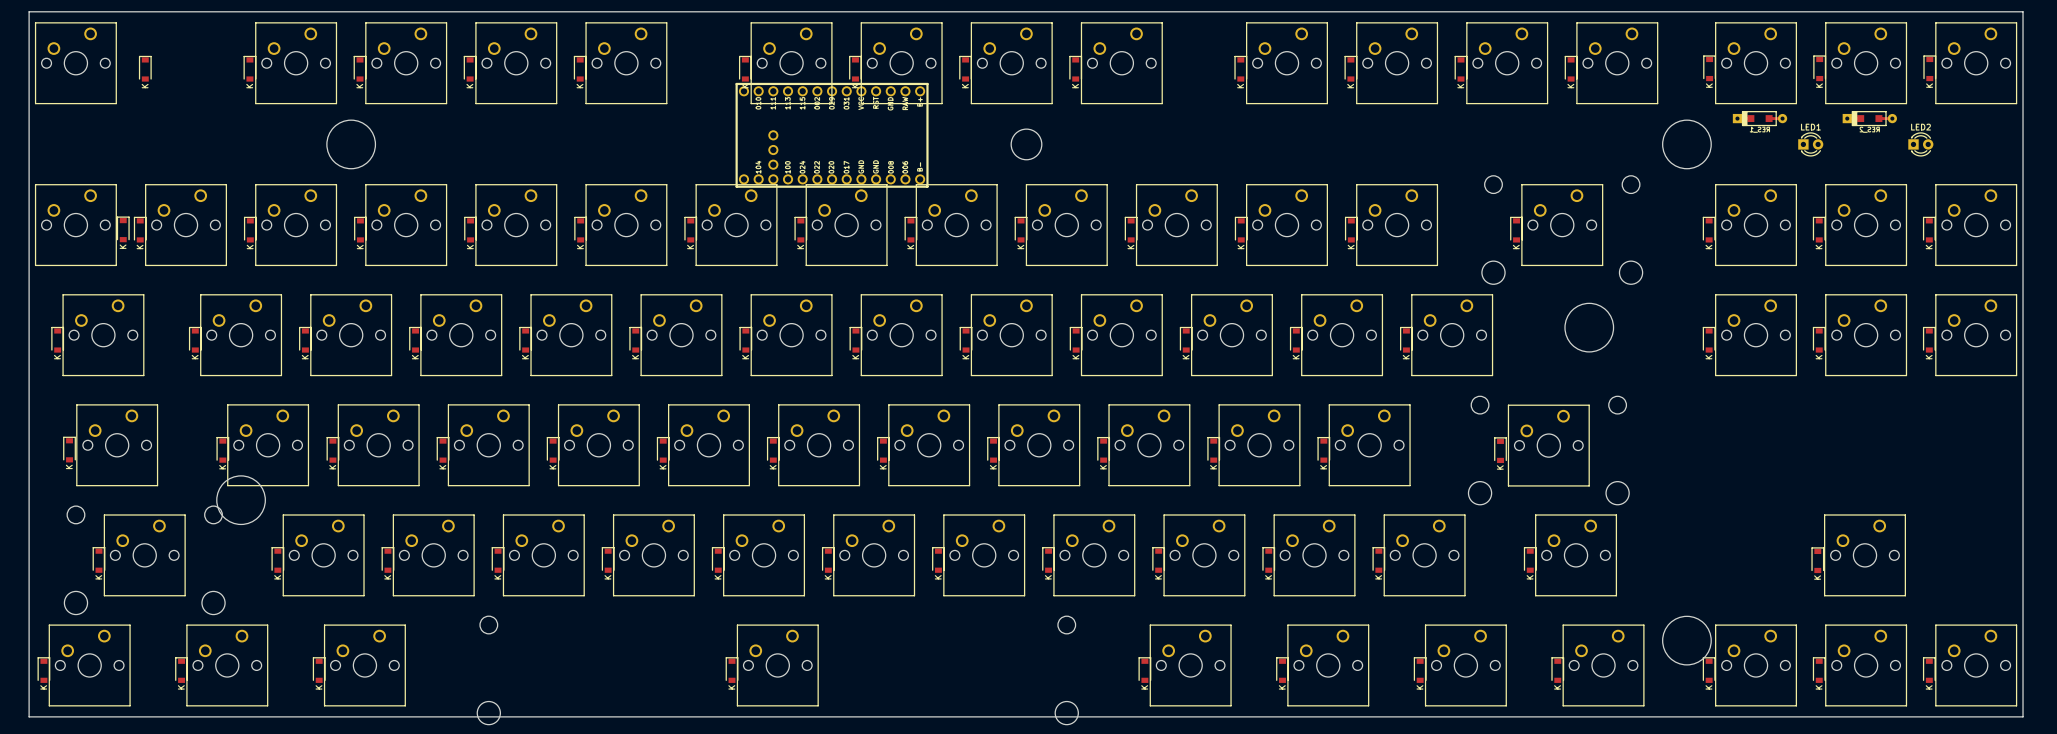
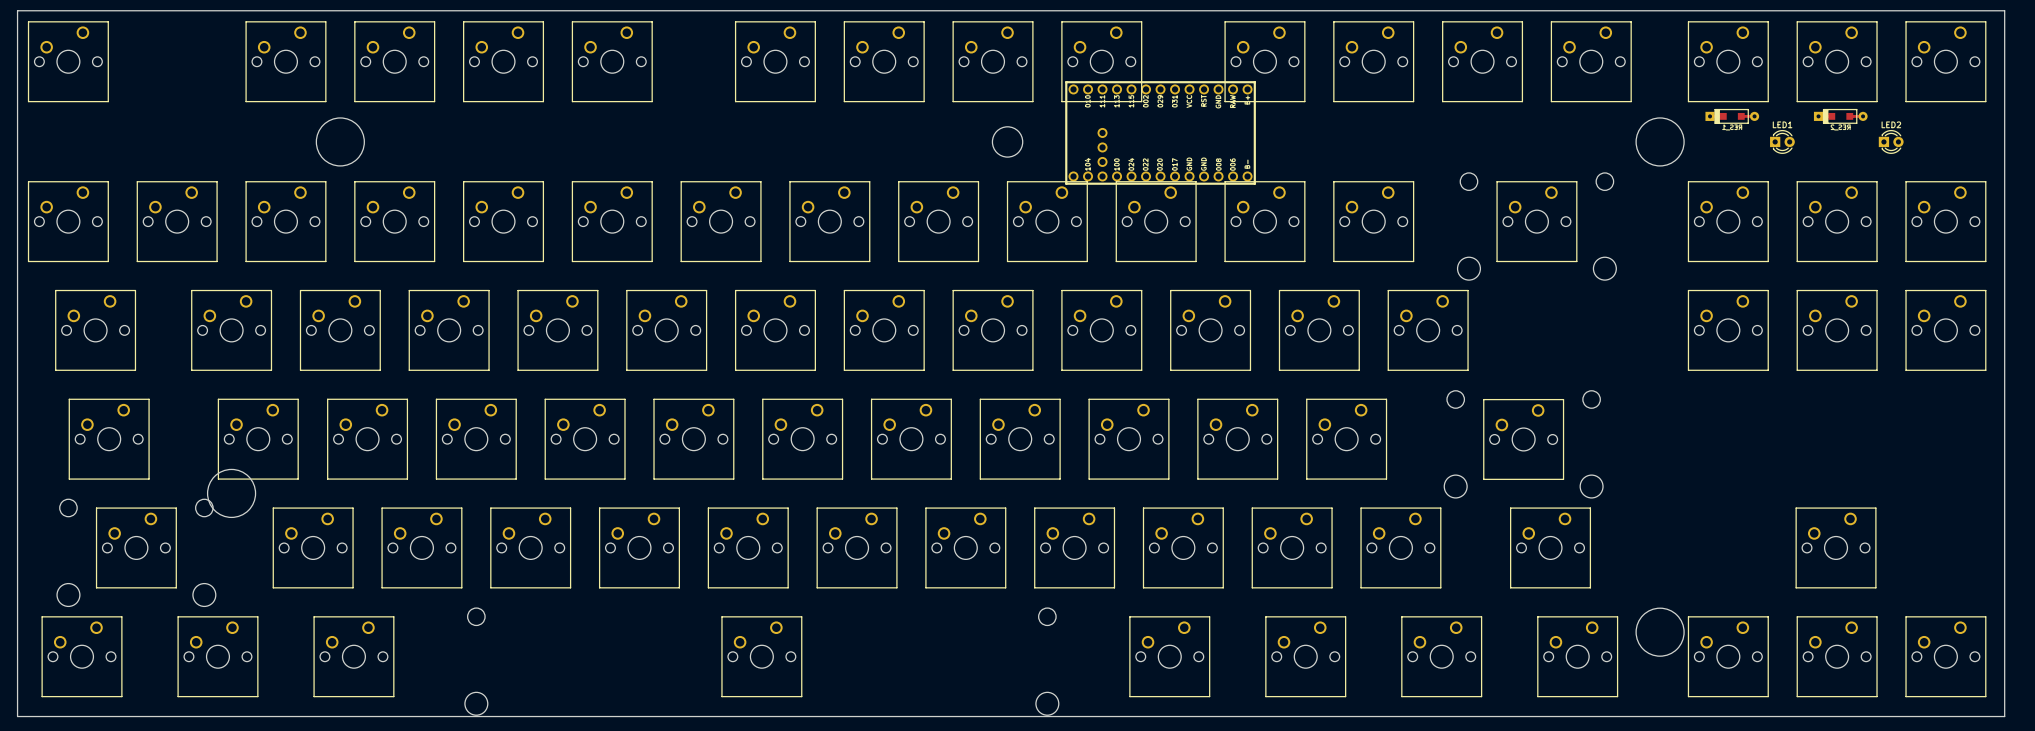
board edge: (29, 11) (2023, 11) (2023, 716) (29, 716) (29, 11) -> (17, 10) (17, 716) (2004, 716) (2004, 10) (17, 10)
part: (145, 68) -> none
part: (249, 68) -> none
part: (360, 68) -> none
part: (470, 68) -> none
part: (580, 68) -> none
part: (745, 68) -> none
part: (855, 68) -> none
part: (965, 68) -> none
part: (1075, 68) -> none
part: (1240, 68) -> none
part: (1350, 68) -> none
part: (1461, 68) -> none
part: (1571, 68) -> none
part: (1709, 68) -> none
part: (1819, 68) -> none
part: (1929, 68) -> none
part: (832, 135) -> none
part: none -> (1160, 132)
part: (123, 229) -> none
part: (140, 229) -> none
part: (250, 229) -> none
part: (360, 229) -> none
part: (470, 229) -> none
part: (580, 229) -> none
part: (690, 229) -> none
part: (800, 229) -> none
part: (910, 229) -> none
part: (1021, 229) -> none
part: (1131, 229) -> none
part: (1241, 229) -> none
part: (1351, 229) -> none
part: (1516, 229) -> none
part: (1709, 229) -> none
part: (1819, 229) -> none
part: (1929, 229) -> none
round board edge: [1564, 302, 1615, 353] -> none
part: (57, 339) -> none
part: (195, 339) -> none
part: (305, 339) -> none
part: (415, 339) -> none
part: (525, 339) -> none
part: (635, 339) -> none
part: (745, 339) -> none
part: (855, 339) -> none
part: (966, 339) -> none
part: (1076, 339) -> none
part: (1186, 339) -> none
part: (1296, 339) -> none
part: (1406, 339) -> none
part: (1709, 339) -> none
part: (1819, 339) -> none
part: (1929, 339) -> none
part: (69, 449) -> none
part: (222, 449) -> none
part: (332, 449) -> none
part: (443, 449) -> none
part: (553, 449) -> none
part: (663, 449) -> none
part: (773, 449) -> none
part: (883, 449) -> none
part: (993, 449) -> none
part: (1103, 449) -> none
part: (1213, 449) -> none
part: (1323, 449) -> none
part: (1500, 450) -> none
part: (99, 560) -> none
part: (277, 560) -> none
part: (387, 560) -> none
part: (498, 560) -> none
part: (608, 560) -> none
part: (718, 560) -> none
part: (828, 560) -> none
part: (938, 560) -> none
part: (1048, 560) -> none
part: (1158, 560) -> none
part: (1268, 560) -> none
part: (1378, 560) -> none
part: (1530, 560) -> none
part: (1817, 560) -> none
part: (43, 670) -> none
part: (181, 670) -> none
part: (319, 670) -> none
part: (732, 670) -> none
part: (1144, 670) -> none
part: (1282, 670) -> none
part: (1420, 670) -> none
part: (1557, 670) -> none
part: (1709, 670) -> none
part: (1819, 670) -> none
part: (1929, 670) -> none

